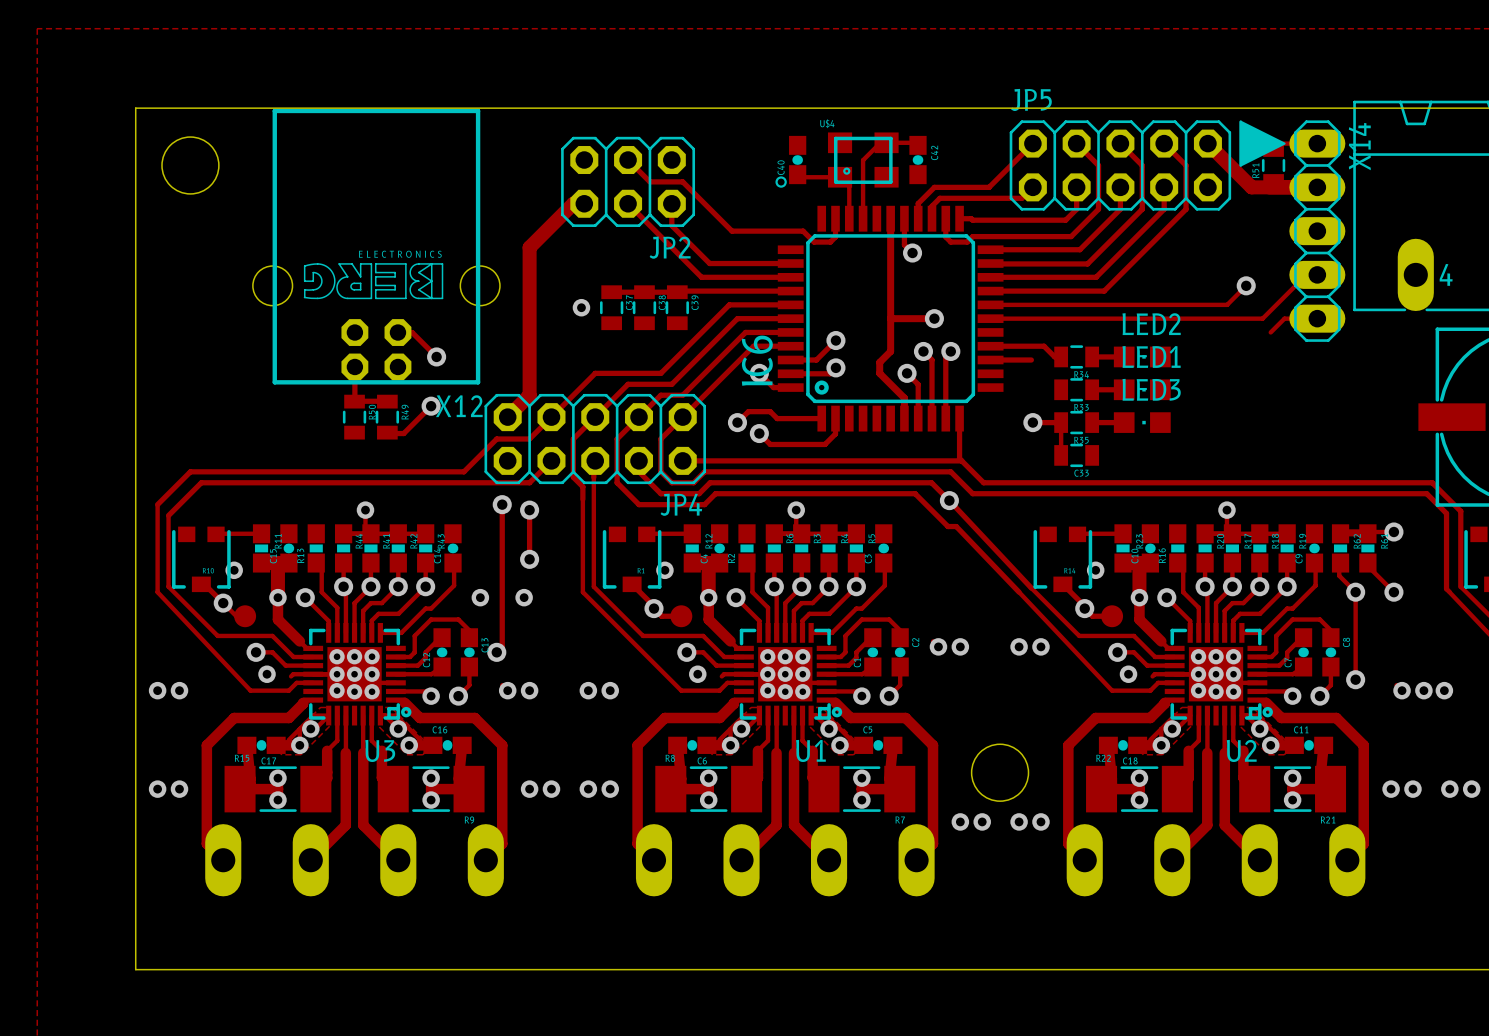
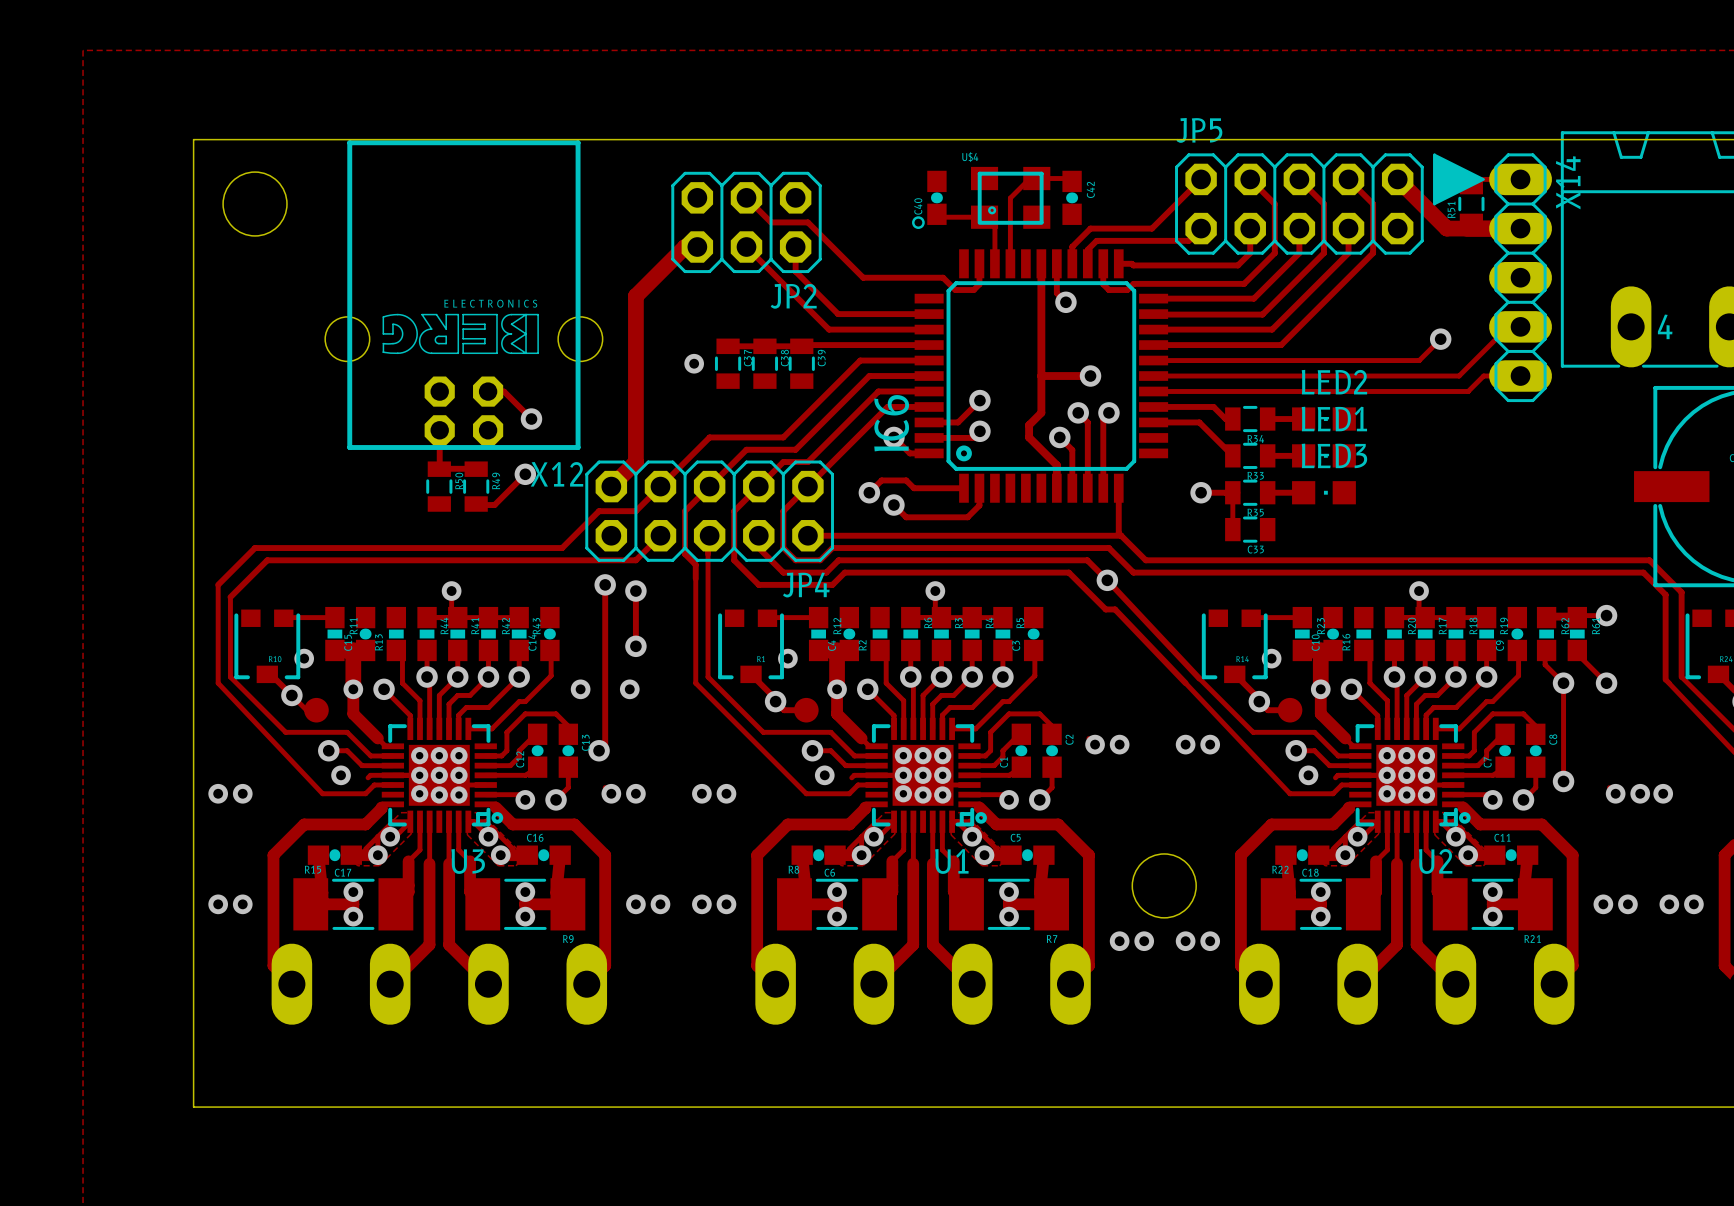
track: none -> (1153, 391) (1468, 391)
track: none -> (1199, 422) (1232, 455)

